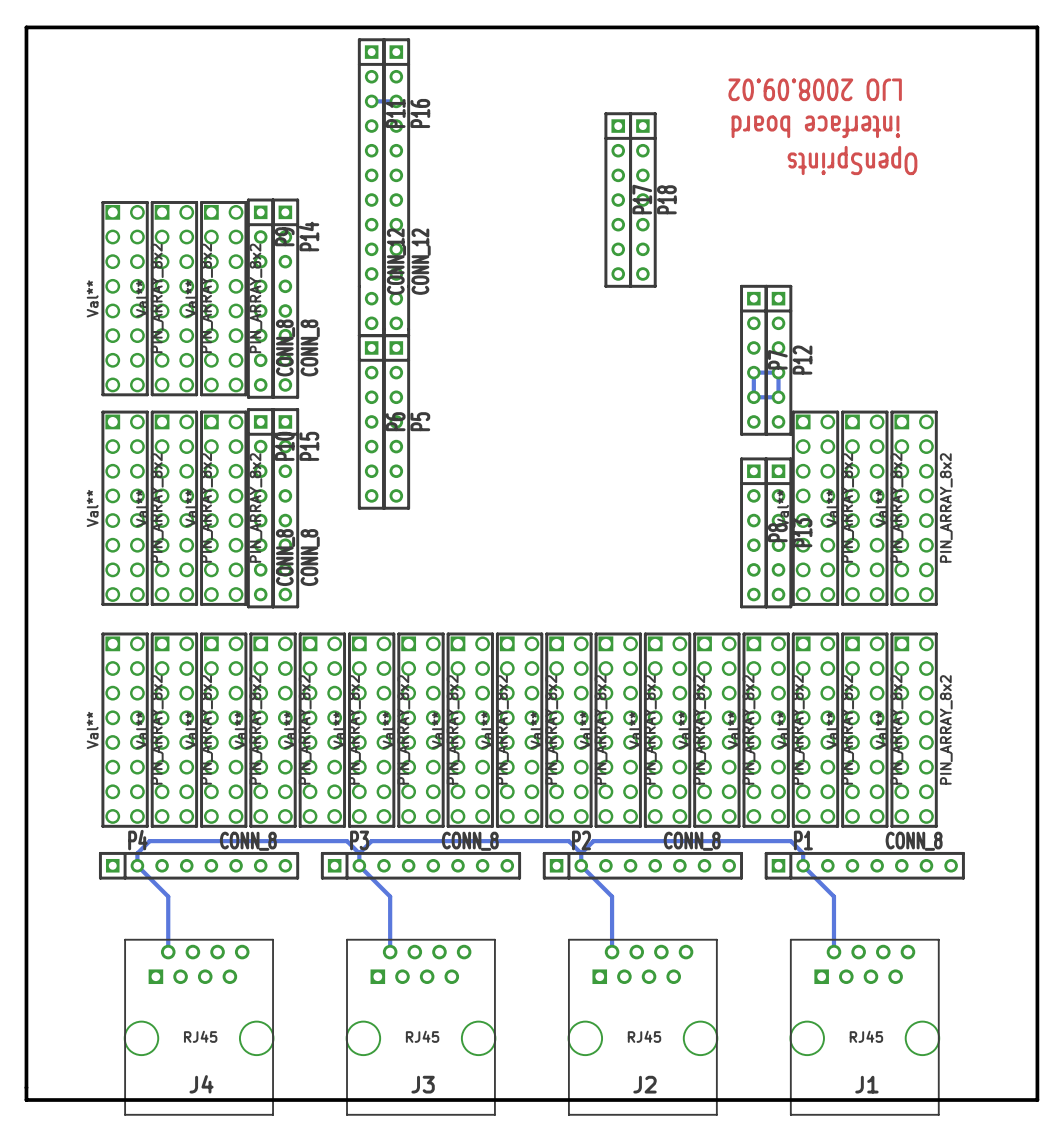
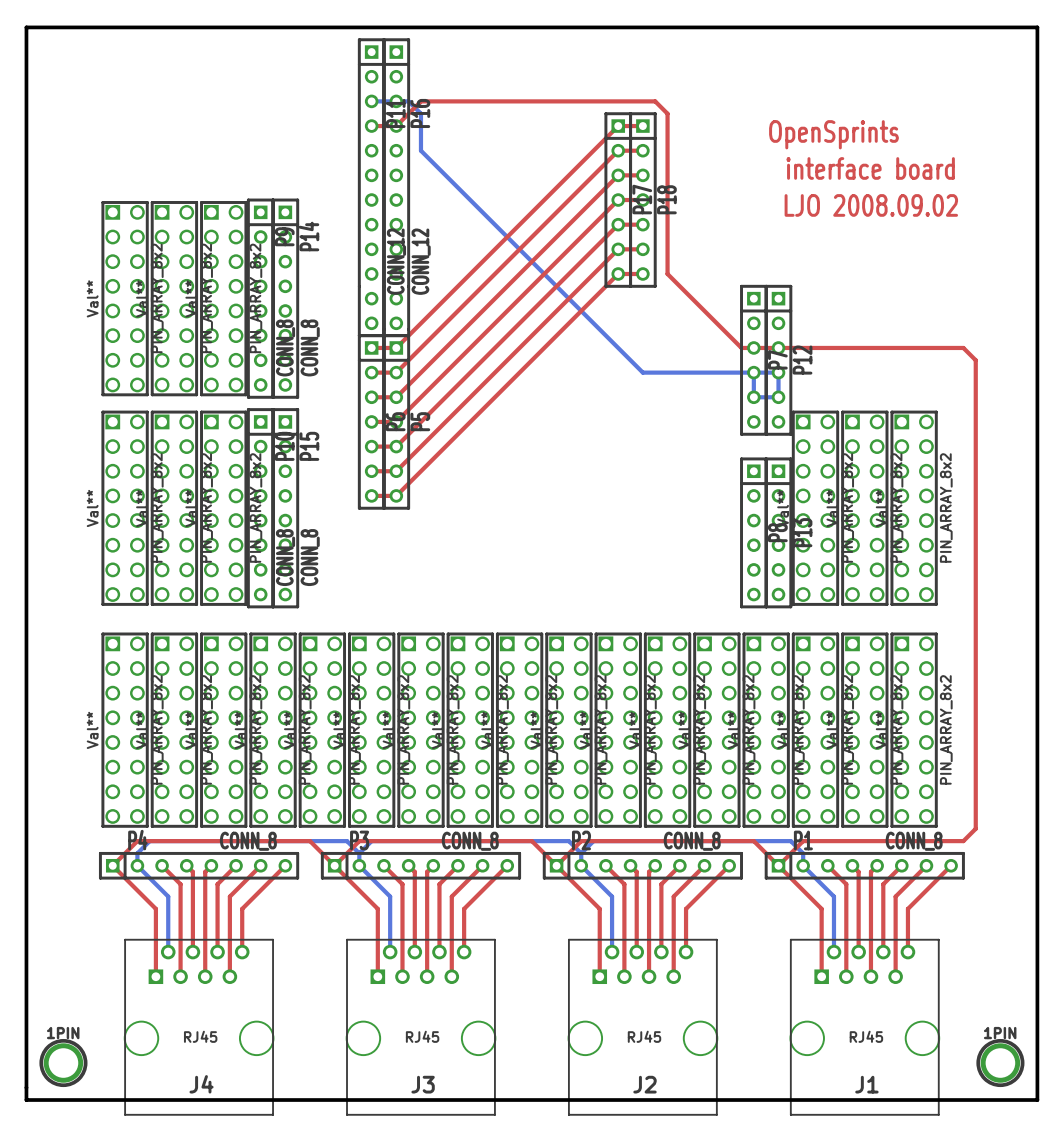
text rotation: 0° (815, 89) -> 180° (871, 205)
bottom track: none -> (396, 101) (408, 101) (420, 113) (420, 150) (642, 372) (753, 372)
top track: none -> (371, 126) (396, 126) (420, 101) (655, 101) (667, 113) (667, 273) (741, 347) (963, 347) (975, 360) (975, 828) (963, 841) (803, 841) (778, 865)
top track: none -> (642, 126) (618, 126) (396, 347) (371, 347)
text rotation: 0° (815, 126) -> 180° (870, 168)
top track: none -> (642, 150) (618, 150) (396, 372) (371, 372)
text rotation: 0° (852, 160) -> 180° (833, 134)
top track: none -> (642, 175) (618, 175) (396, 397) (371, 397)
top track: none -> (642, 200) (618, 200) (396, 421) (371, 421)
top track: none -> (642, 224) (618, 224) (396, 446) (371, 446)
top track: none -> (642, 249) (618, 249) (396, 471) (371, 471)
top track: none -> (642, 273) (618, 273) (396, 495) (371, 495)
top track: none -> (162, 865) (180, 884) (180, 976)
top track: none -> (186, 865) (192, 871) (192, 952)
top track: none -> (211, 865) (205, 871) (205, 976)
top track: none -> (236, 865) (217, 884) (217, 952)
top track: none -> (260, 865) (229, 896) (229, 976)
top track: none -> (285, 865) (242, 908) (242, 952)
top track: none -> (334, 865) (359, 841) (531, 841) (599, 908) (599, 976)
top track: none -> (383, 865) (402, 884) (402, 976)
top track: none -> (408, 865) (414, 871) (414, 952)
top track: none -> (433, 865) (427, 871) (427, 976)
top track: none -> (457, 865) (439, 884) (439, 952)
top track: none -> (482, 865) (451, 896) (451, 976)
top track: none -> (507, 865) (464, 908) (464, 952)
top track: none -> (556, 865) (581, 841) (753, 841) (821, 908) (821, 976)
top track: none -> (605, 865) (624, 884) (624, 976)
top track: none -> (630, 865) (636, 871) (636, 952)
top track: none -> (655, 865) (649, 871) (649, 976)
top track: none -> (679, 865) (661, 884) (661, 952)
top track: none -> (704, 865) (673, 896) (673, 976)
top track: none -> (729, 865) (686, 908) (686, 952)
top track: none -> (827, 865) (846, 884) (846, 976)
top track: none -> (852, 865) (858, 871) (858, 952)
top track: none -> (877, 865) (870, 871) (870, 976)
top track: none -> (901, 865) (883, 884) (883, 952)
top track: none -> (926, 865) (895, 896) (895, 976)
top track: none -> (951, 865) (907, 908) (907, 952)
top track: none -> (155, 976) (155, 908) (112, 865) (137, 841) (310, 841) (377, 908) (377, 976)
1PIN: none -> (63, 1063)
1PIN: none -> (1000, 1063)

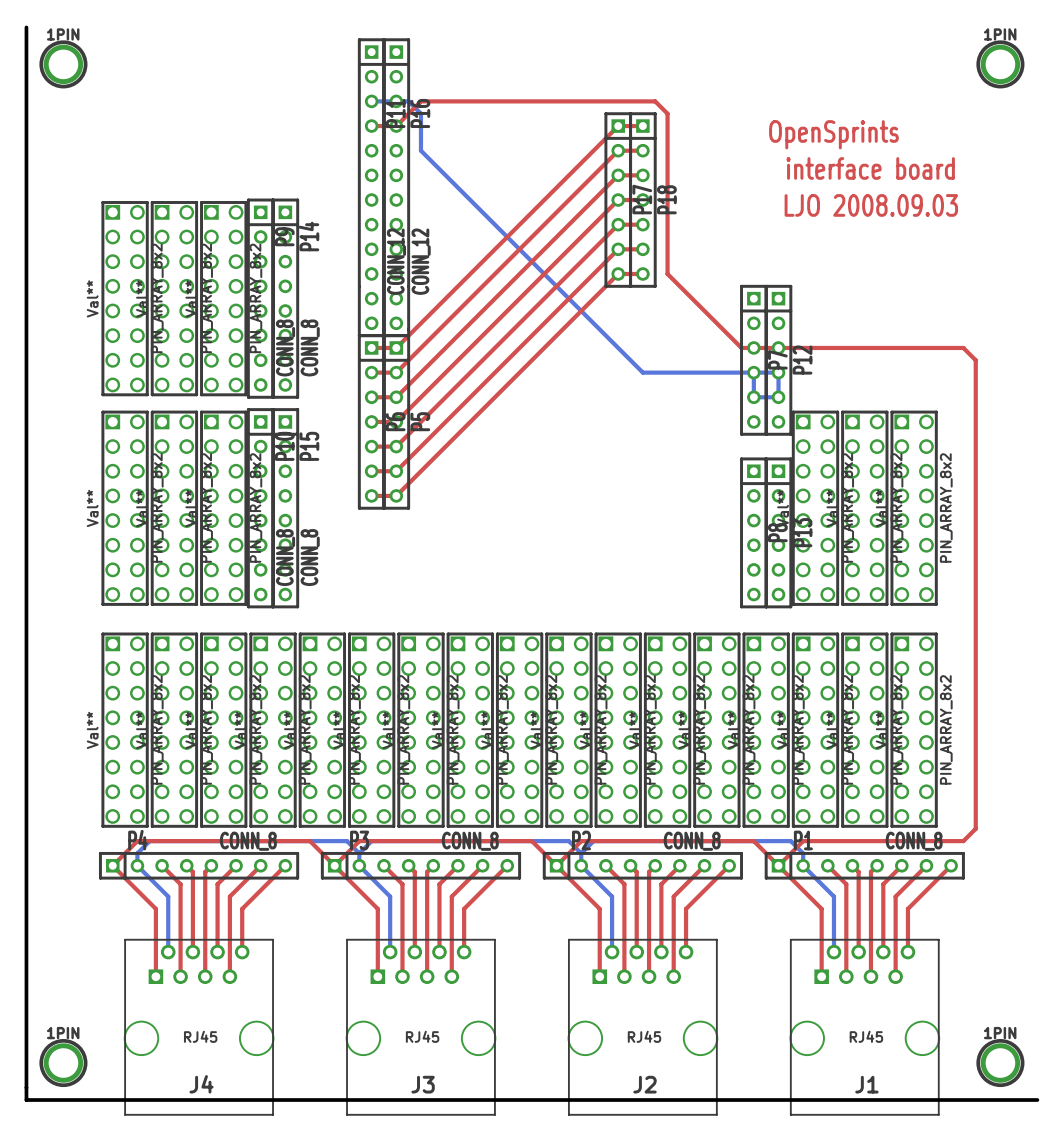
board edge: (26, 27) (1037, 27) (1037, 1100) -> none
1PIN: none -> (63, 64)
1PIN: none -> (1000, 64)
text: LJO 2008.09.02 (871, 205) -> LJO 2008.09.03 (871, 205)

